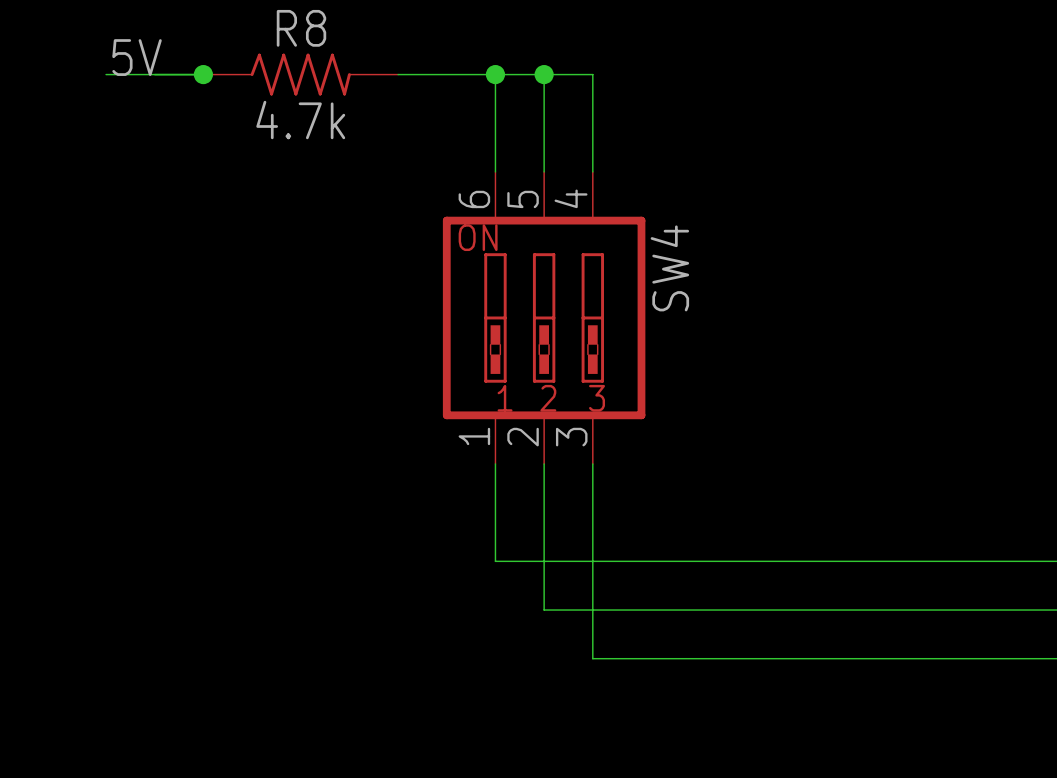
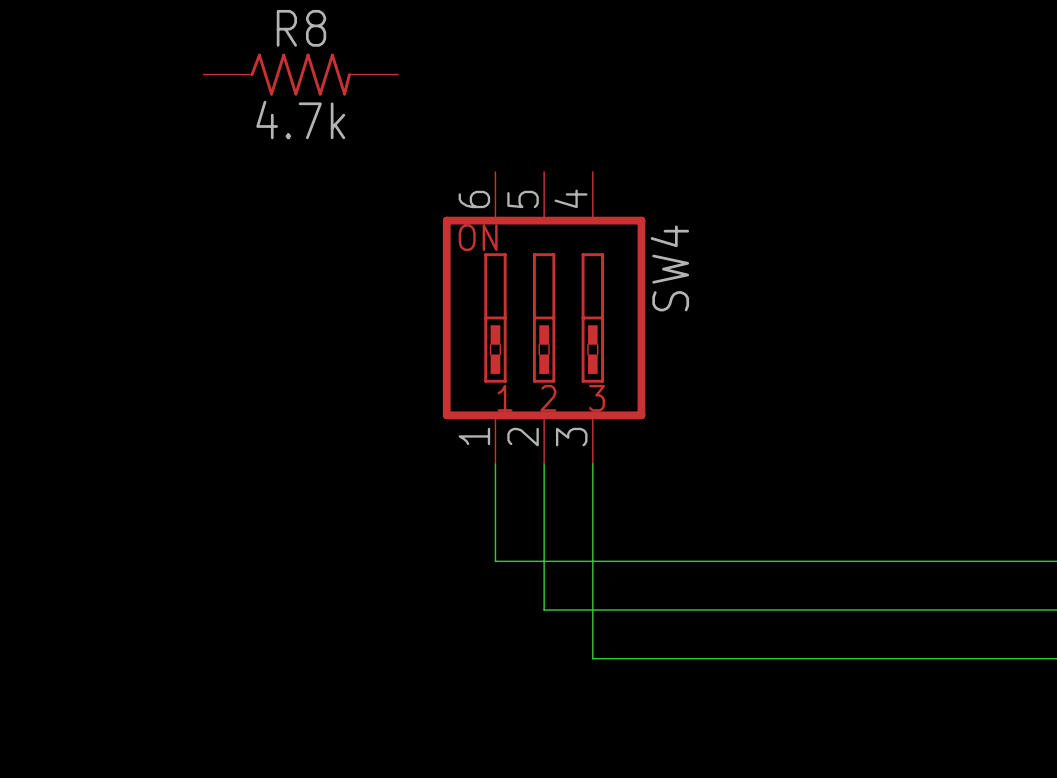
label: 5V (137, 57) -> none
wire: (106, 74) (203, 74) -> none
junction: (203, 74) -> none
wire: (398, 74) (592, 74) (592, 171) -> none
wire: (495, 74) (495, 171) -> none
junction: (495, 74) -> none
wire: (544, 74) (544, 171) -> none
junction: (544, 74) -> none

